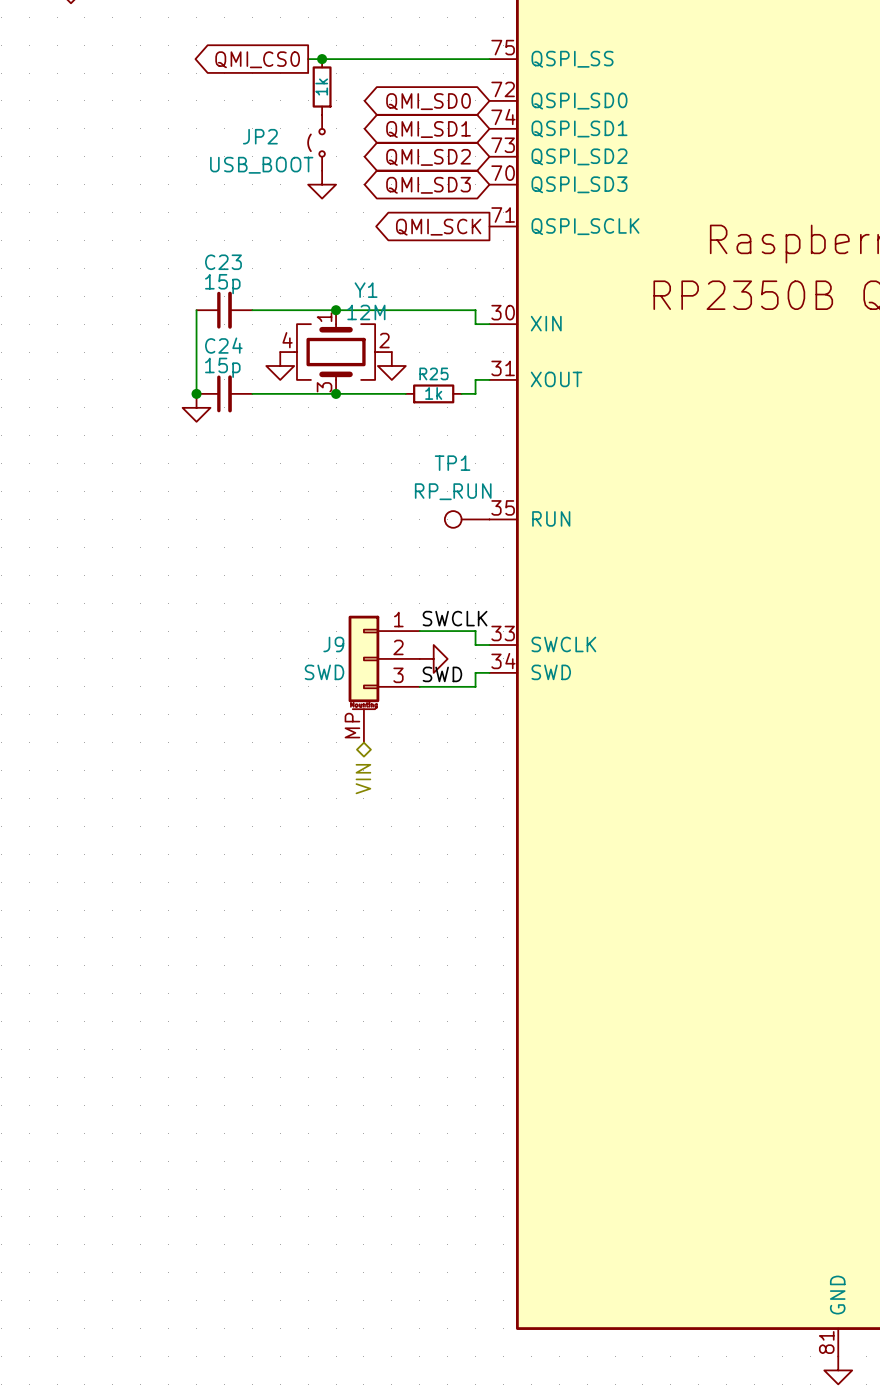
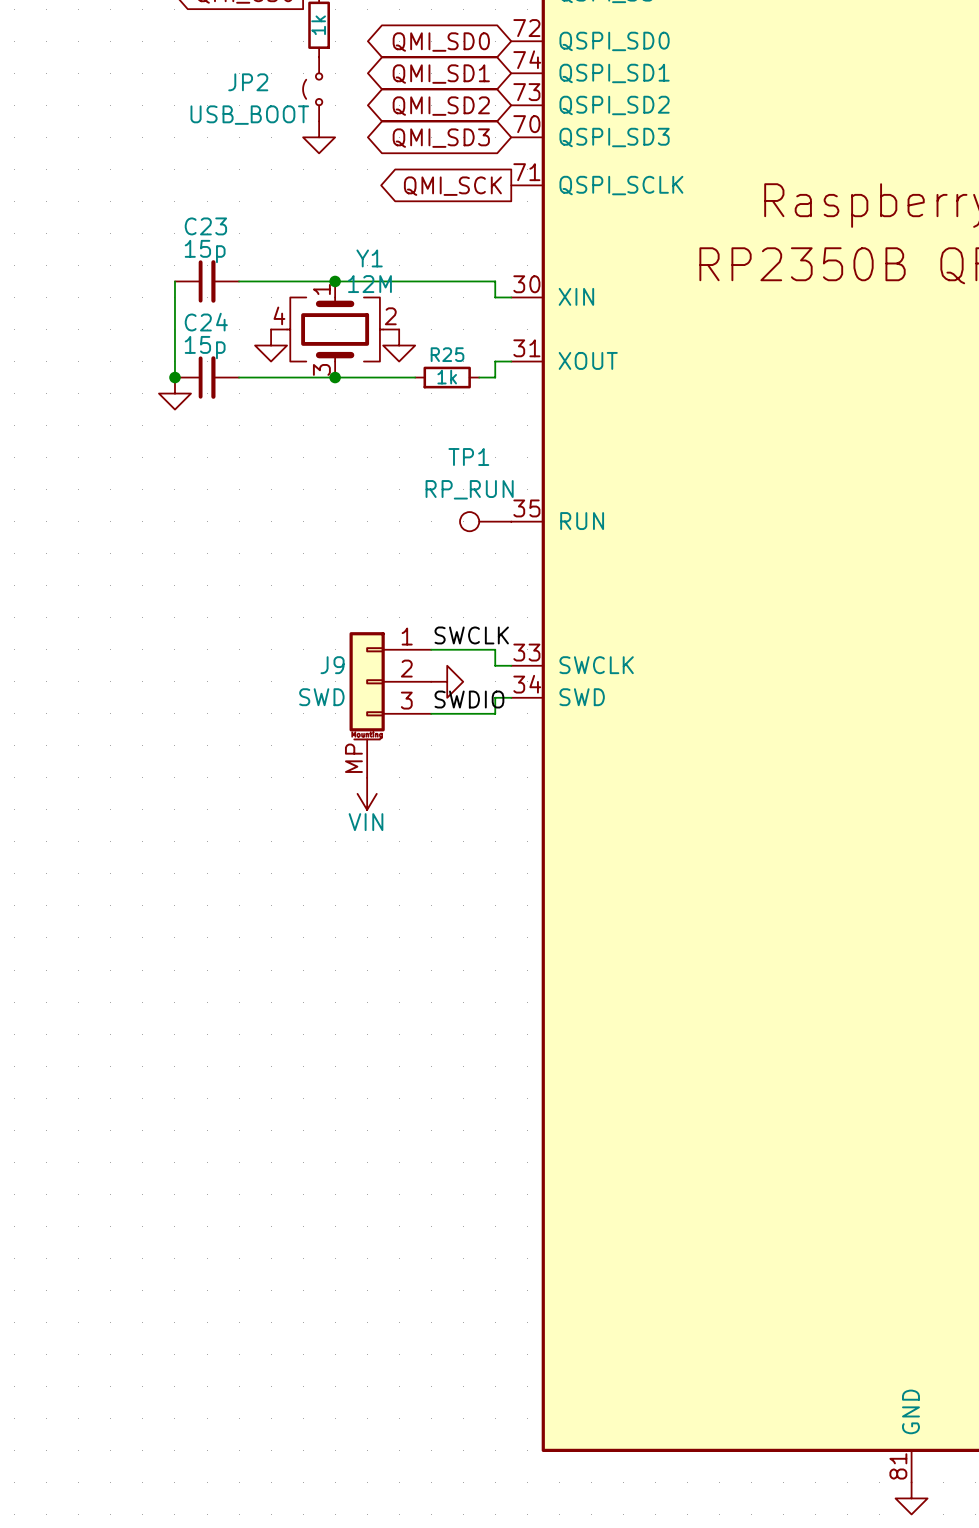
label: SWD (442, 674) -> SWDIO (469, 699)
power symbol: none -> VIN (367, 793)
hierarchical label: VIN (363, 779) -> none

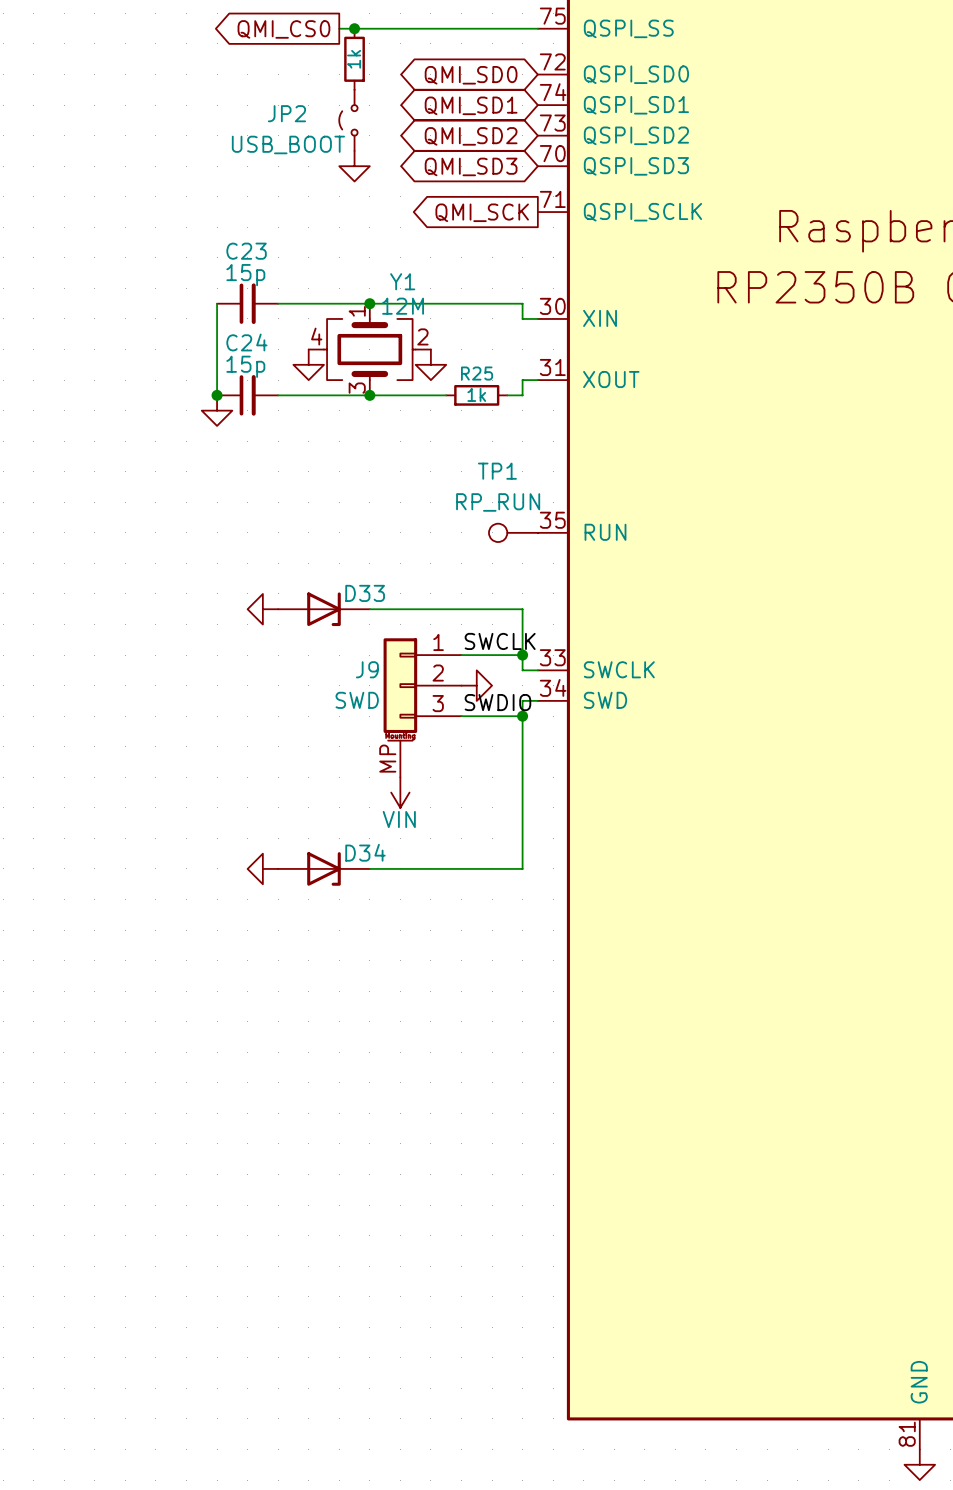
power symbol: none -> (262, 609)
D33: none -> (323, 609)
wire: none -> (369, 609) (522, 609) (522, 655)
junction: none -> (522, 655)
wire: none -> (522, 716) (522, 868) (369, 868)
junction: none -> (522, 716)
power symbol: none -> (262, 868)
D34: none -> (323, 868)

